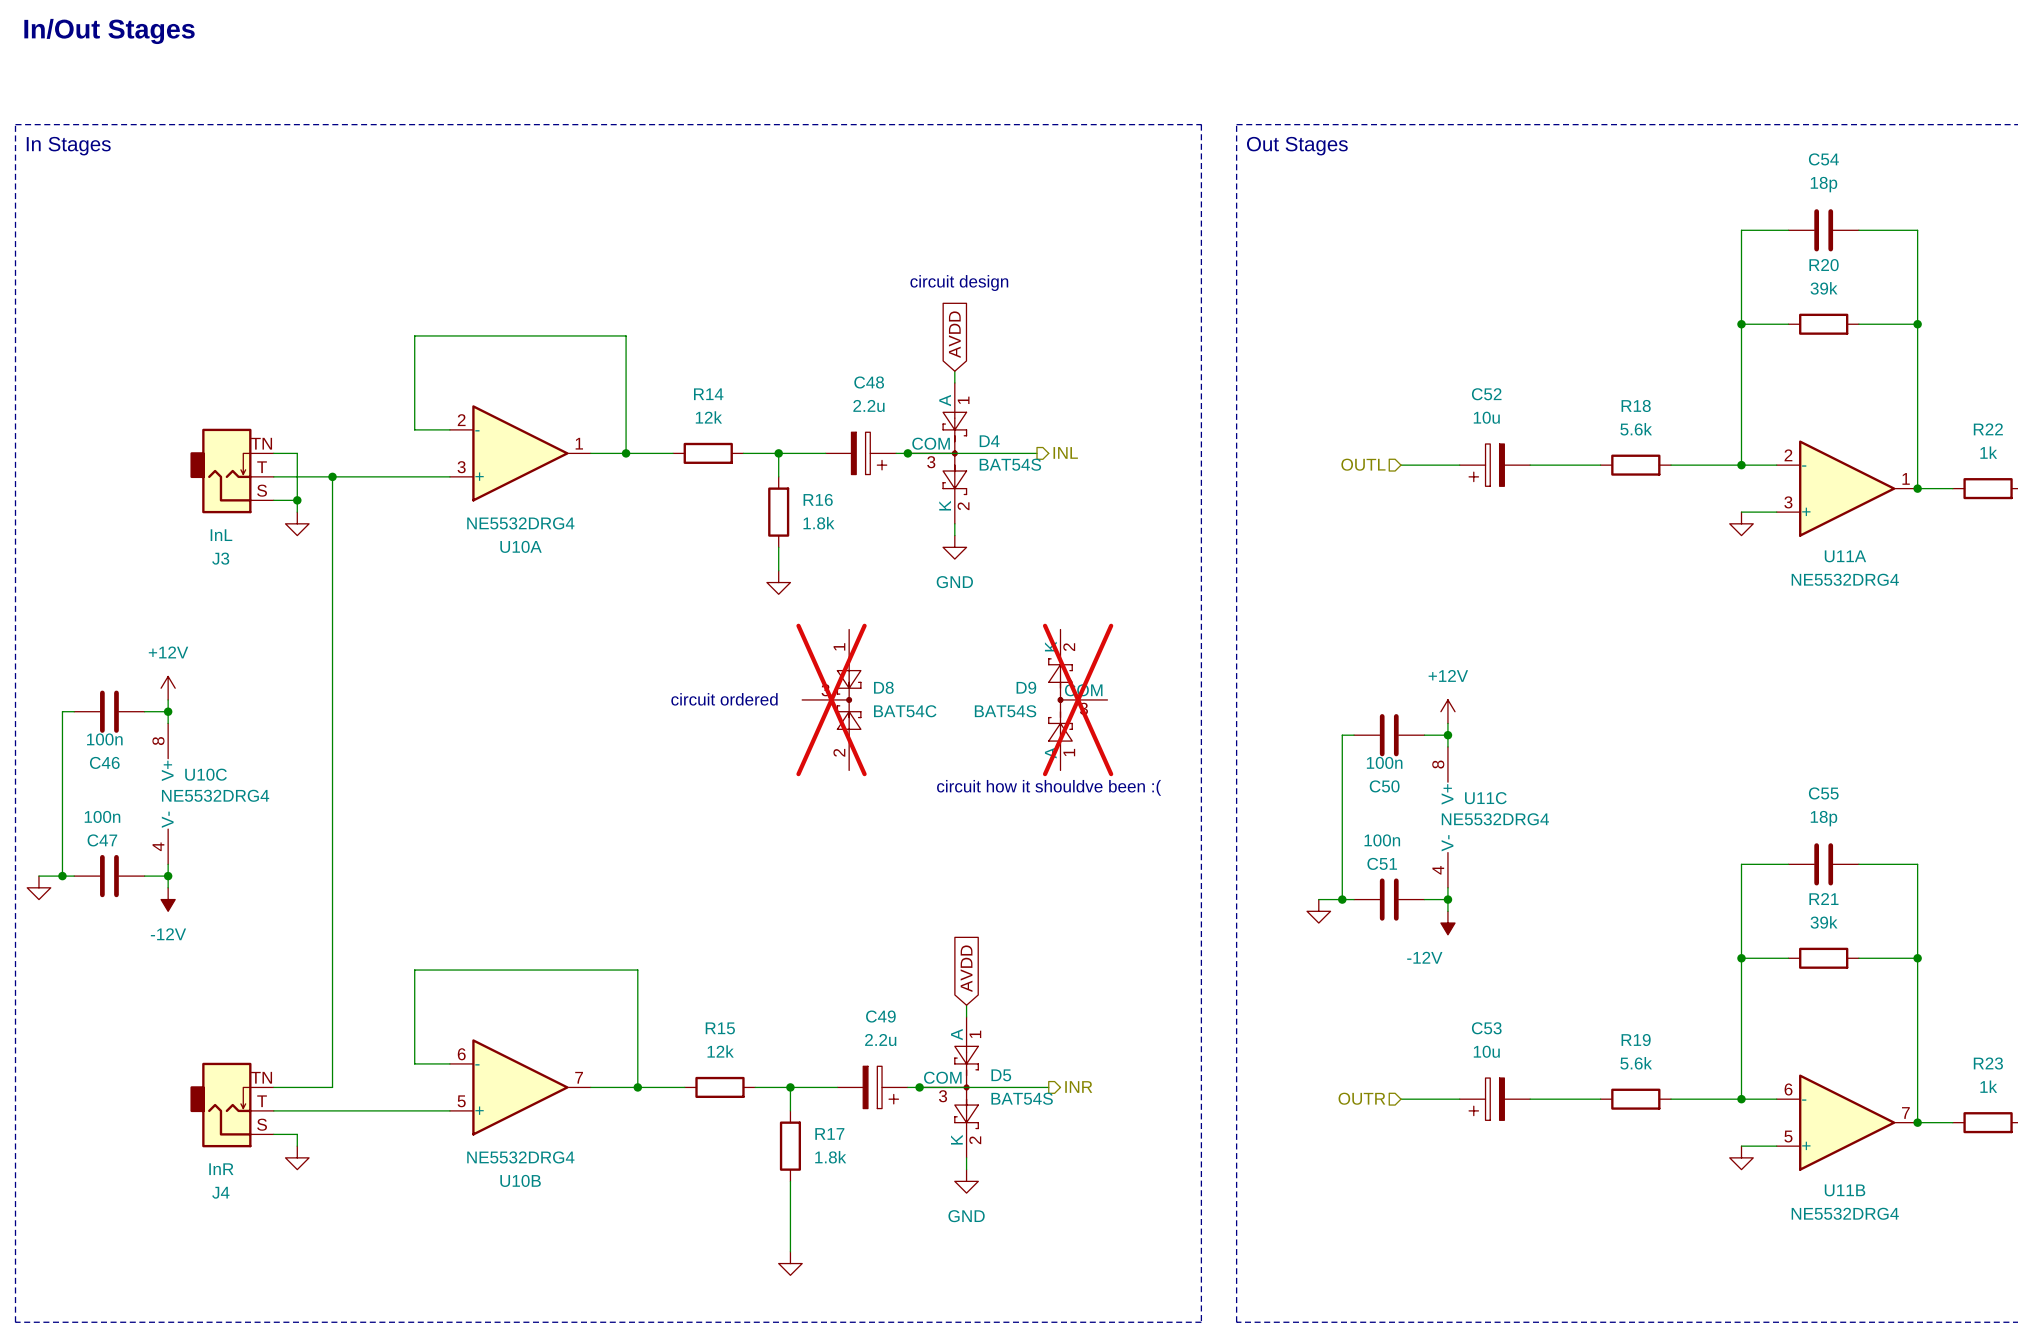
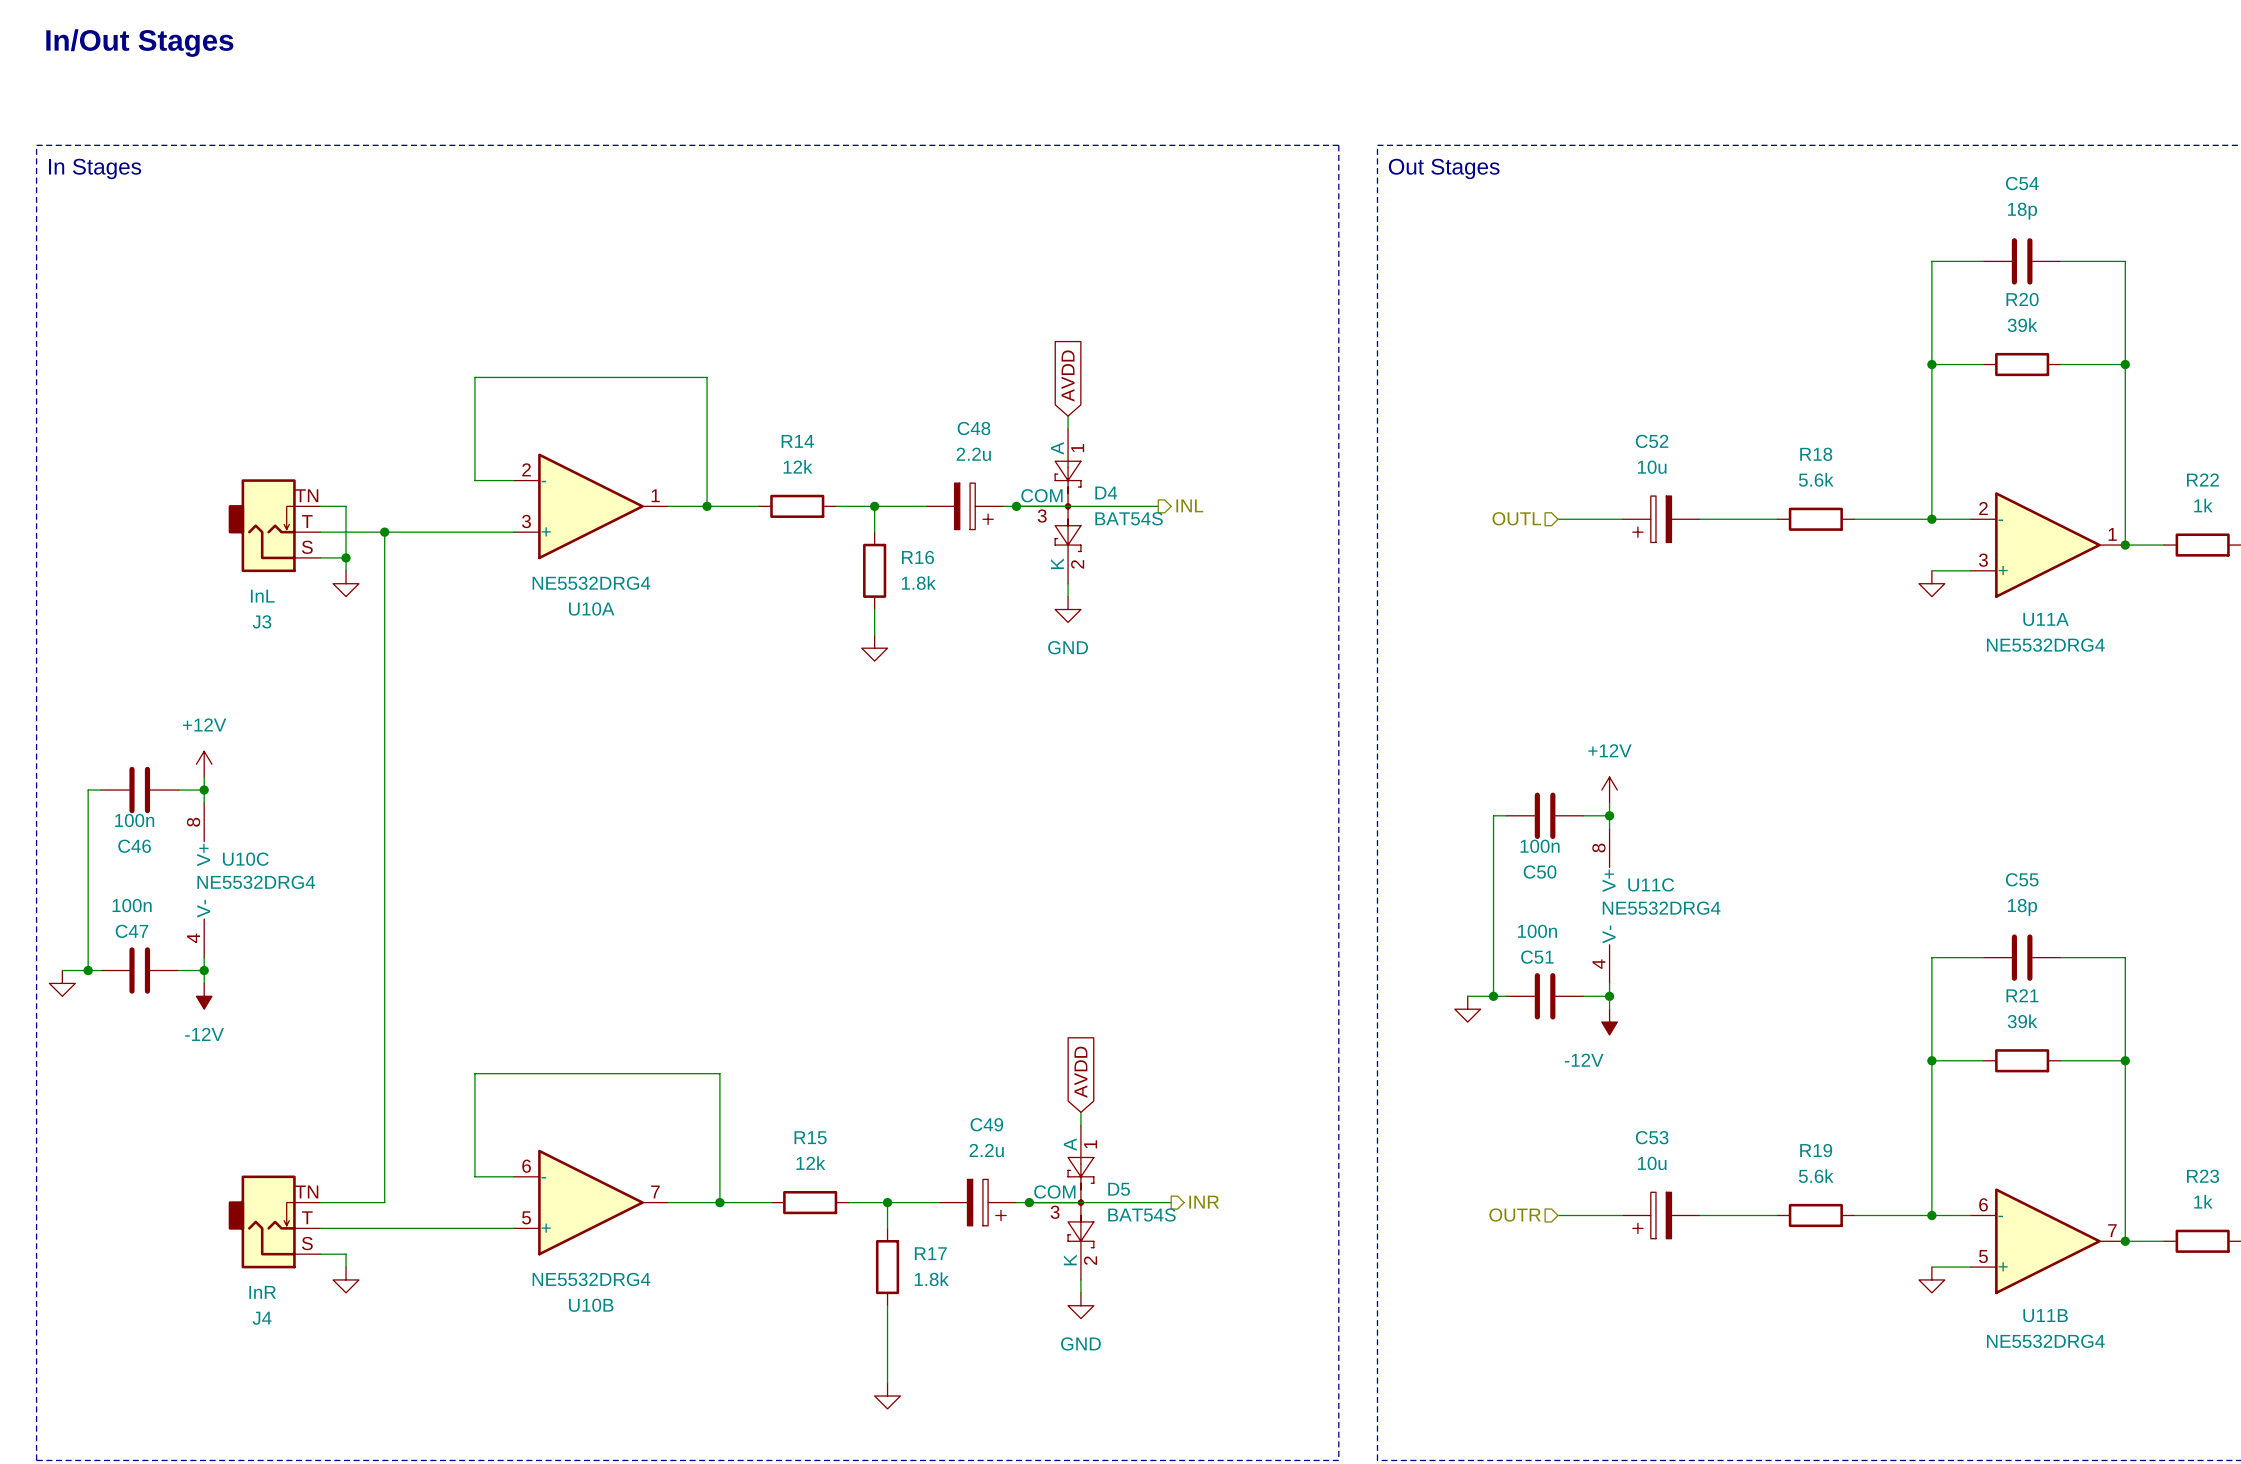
text: circuit design (959, 283) -> none
text: circuit ordered (724, 699) -> none
D8: BAT54C (831, 699) -> none
D9: BAT54S (1078, 699) -> none
text: circuit how it shouldve been :( (1049, 787) -> none

